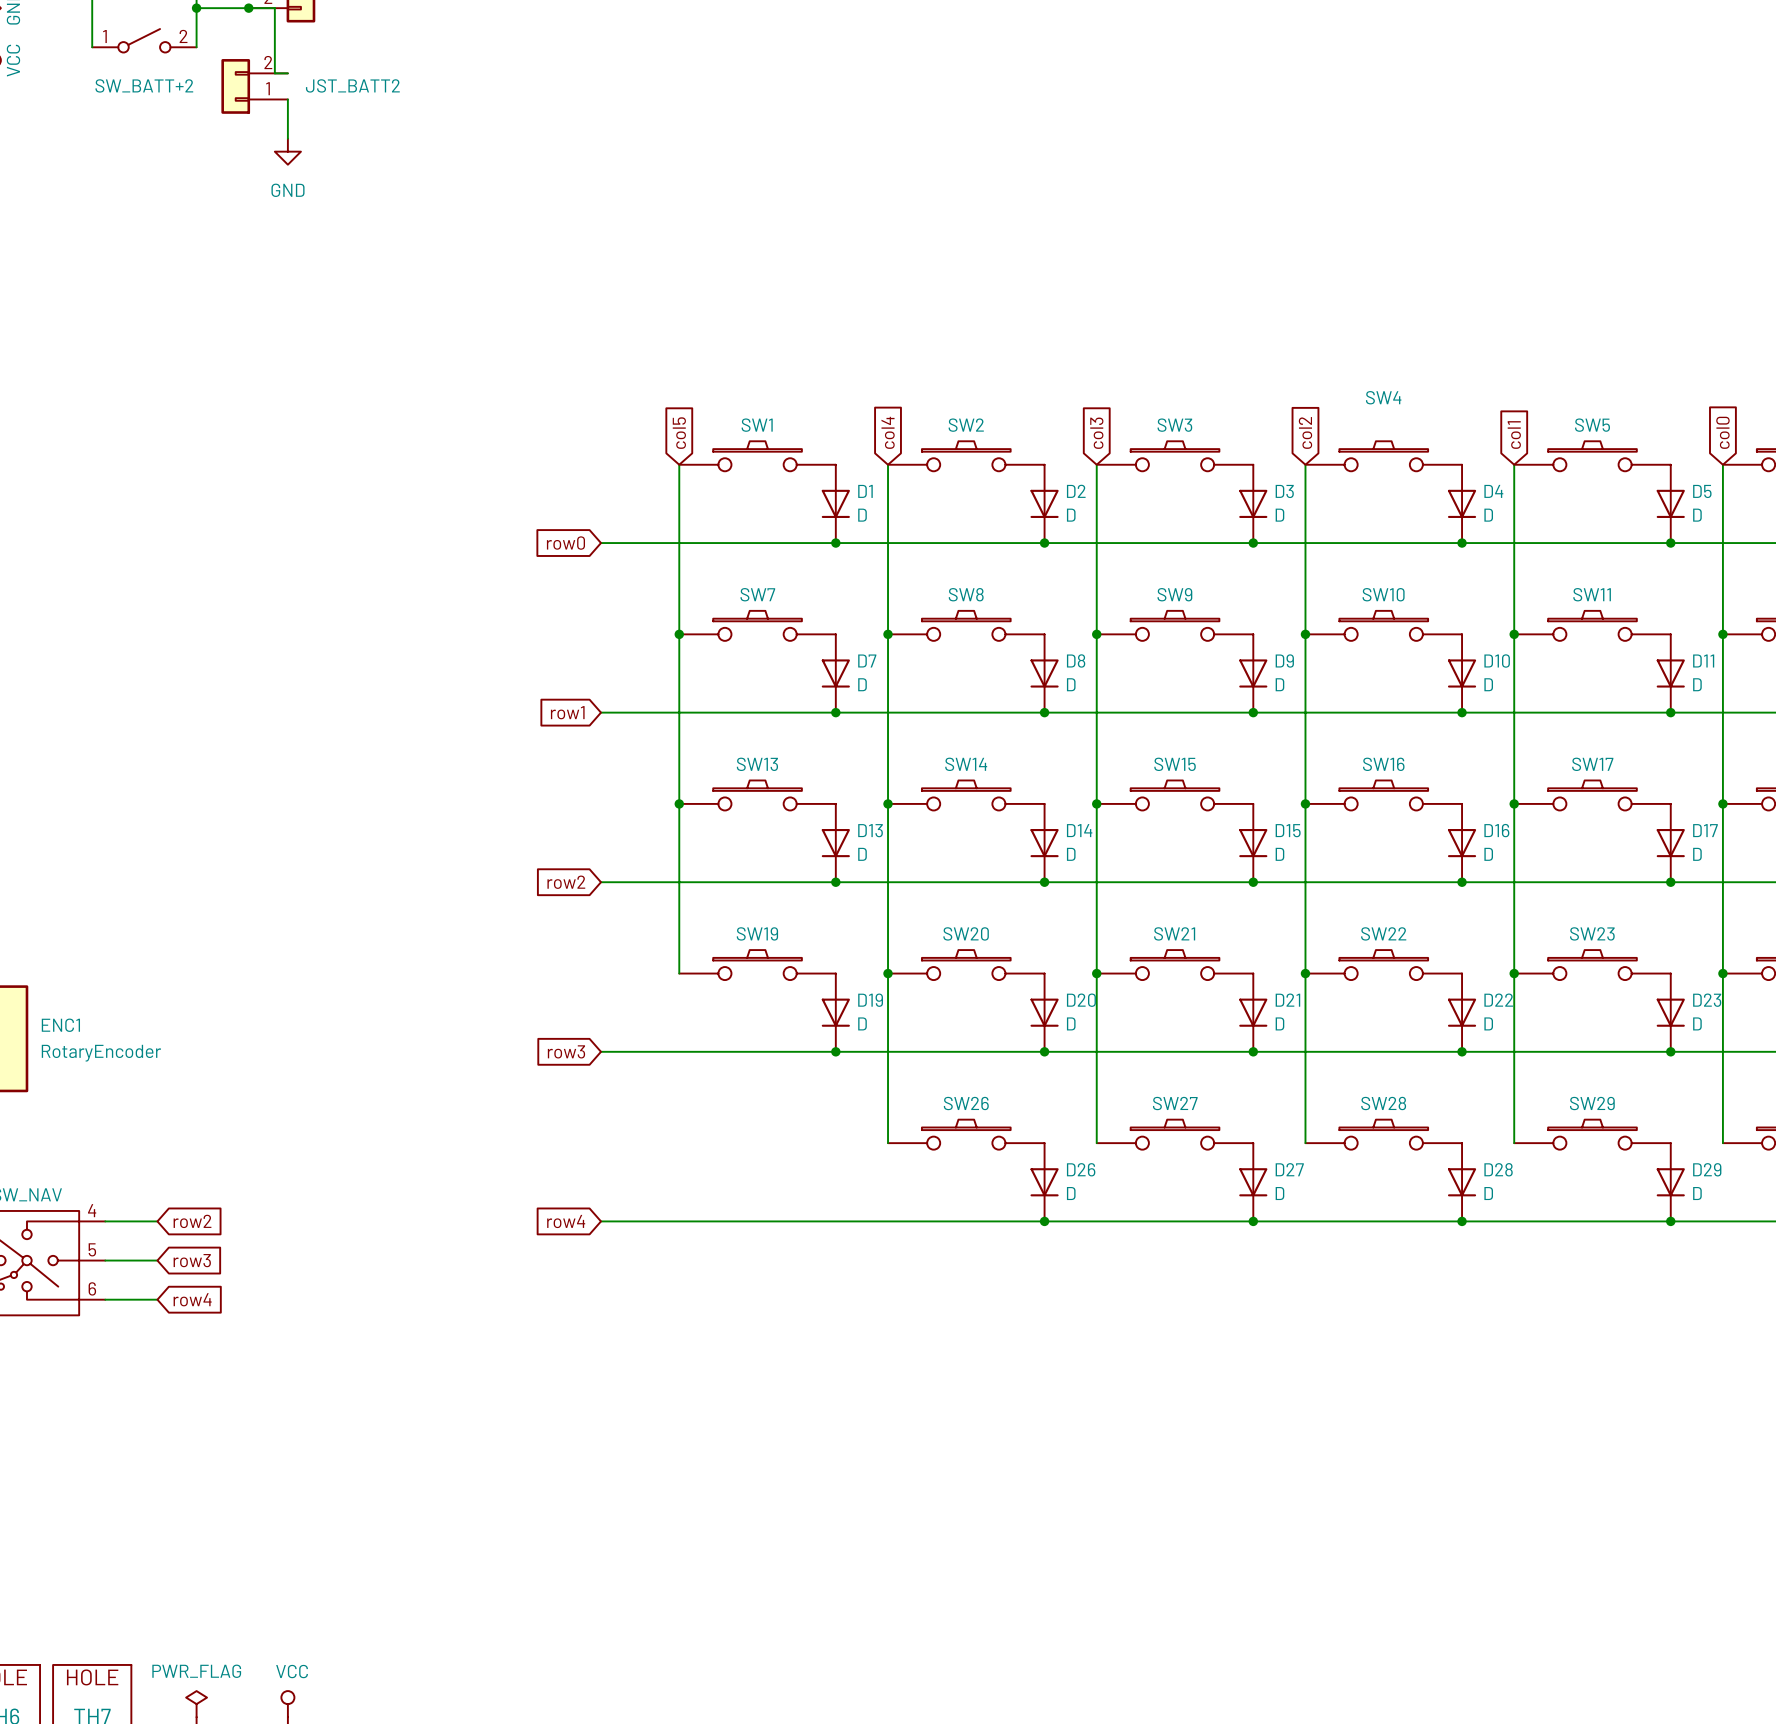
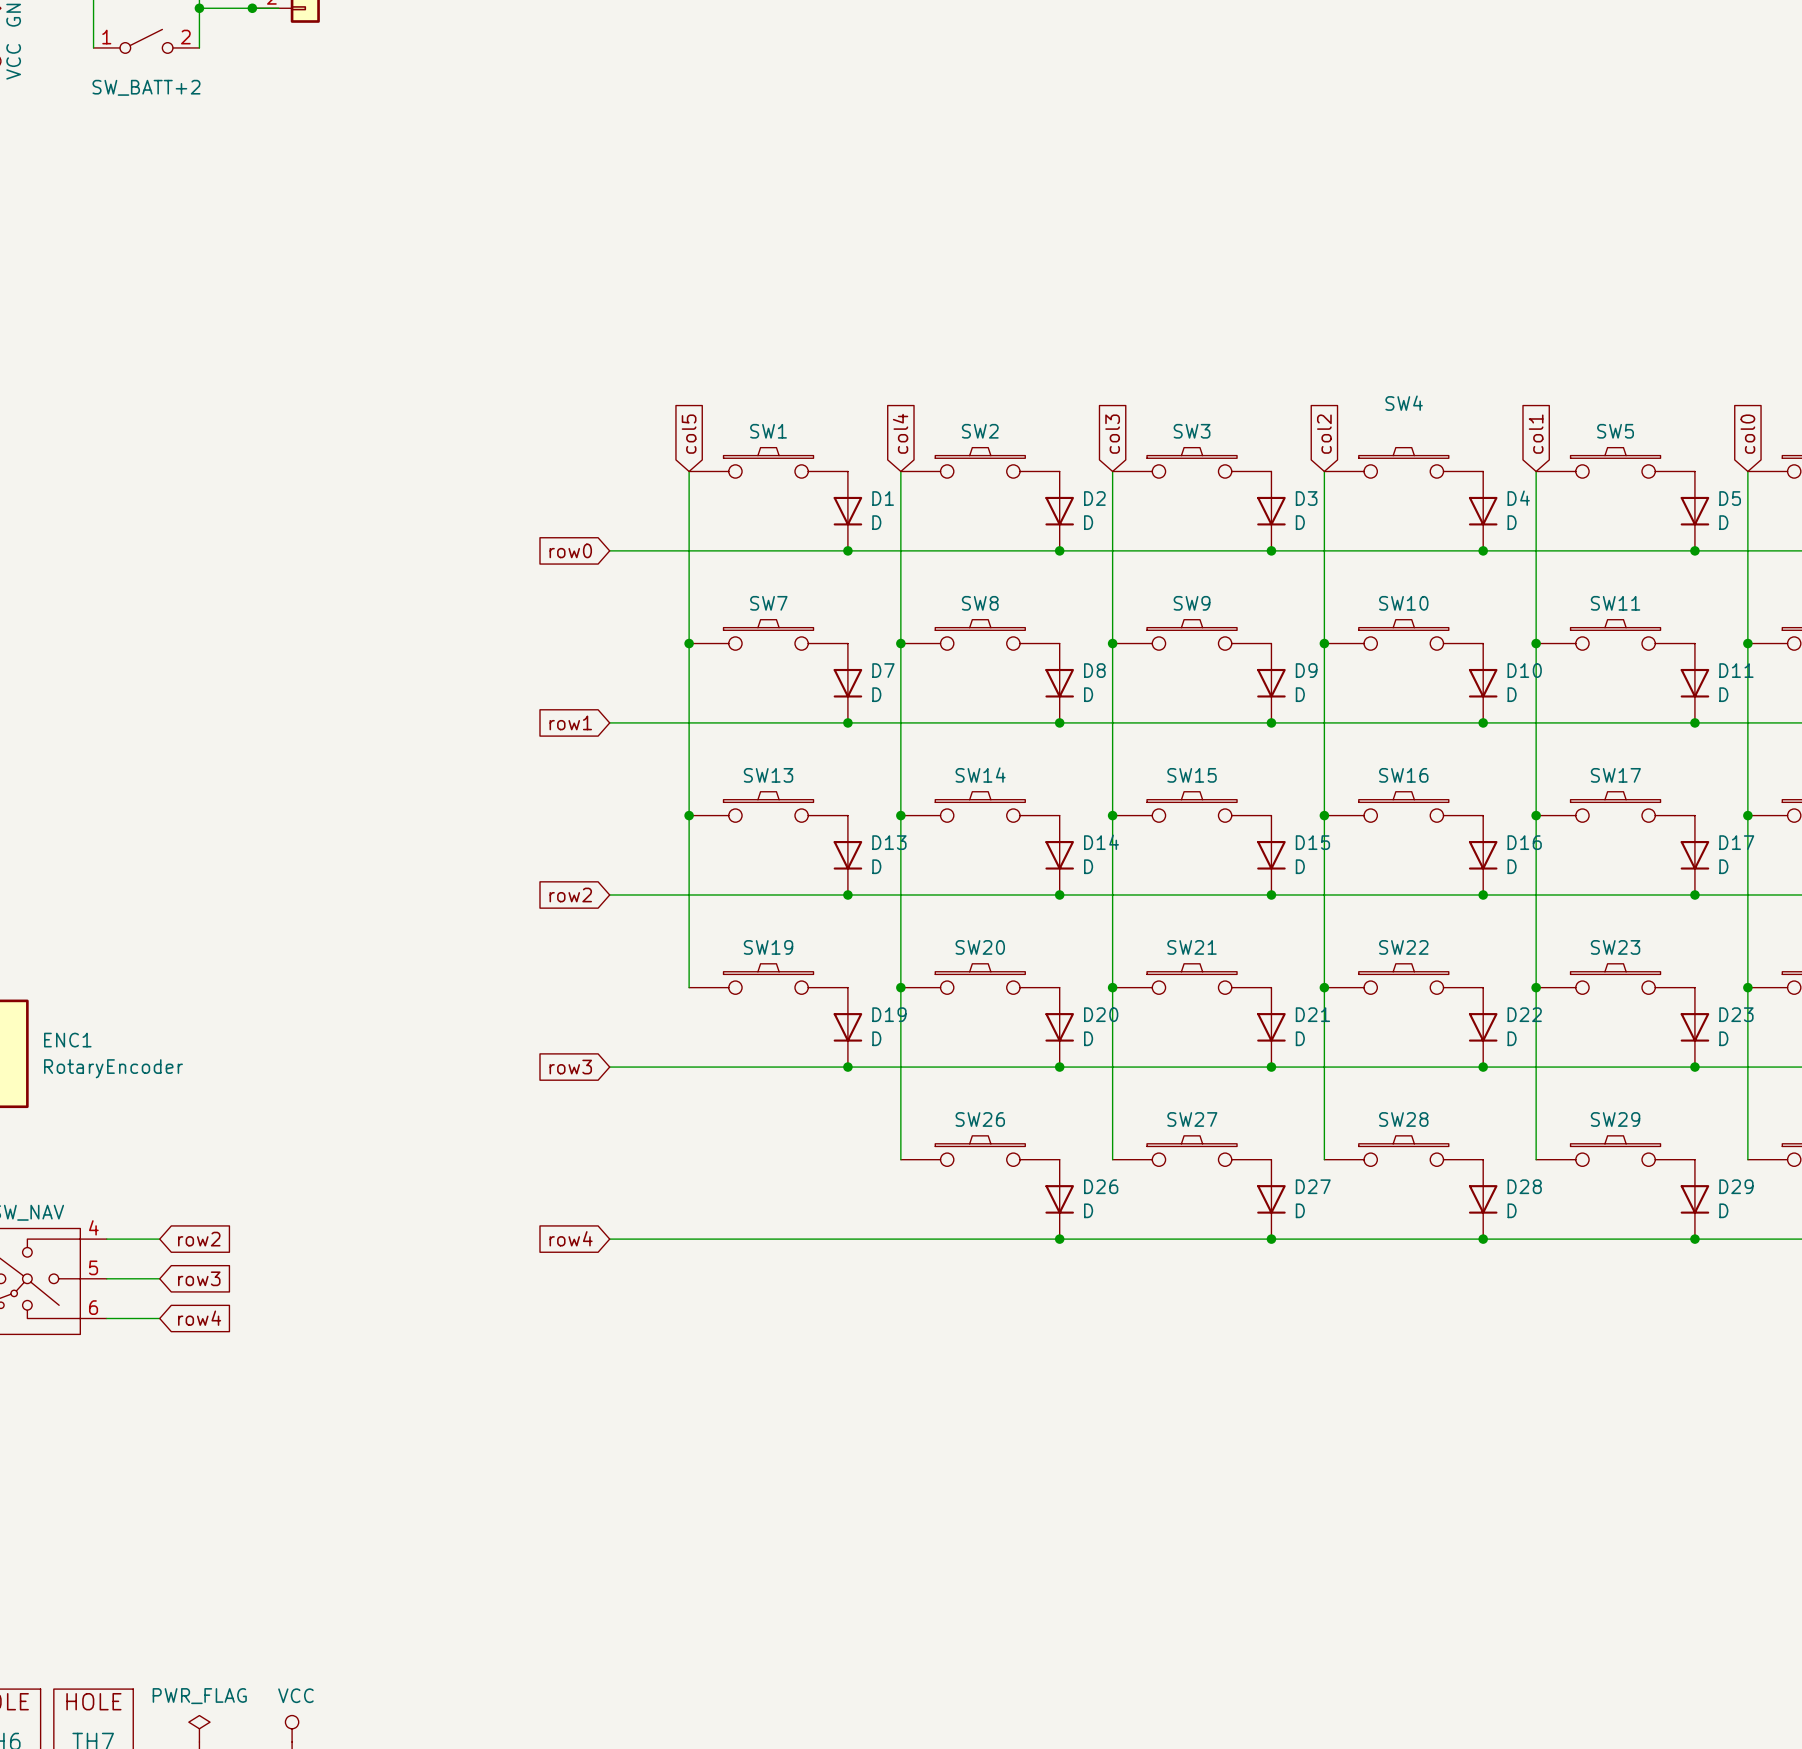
wire: (274, 8) (274, 73) (287, 73) -> none
JST_BATT2: (254, 86) -> none
wire: (287, 99) (287, 138) -> none
power symbol: GND (287, 151) -> none

